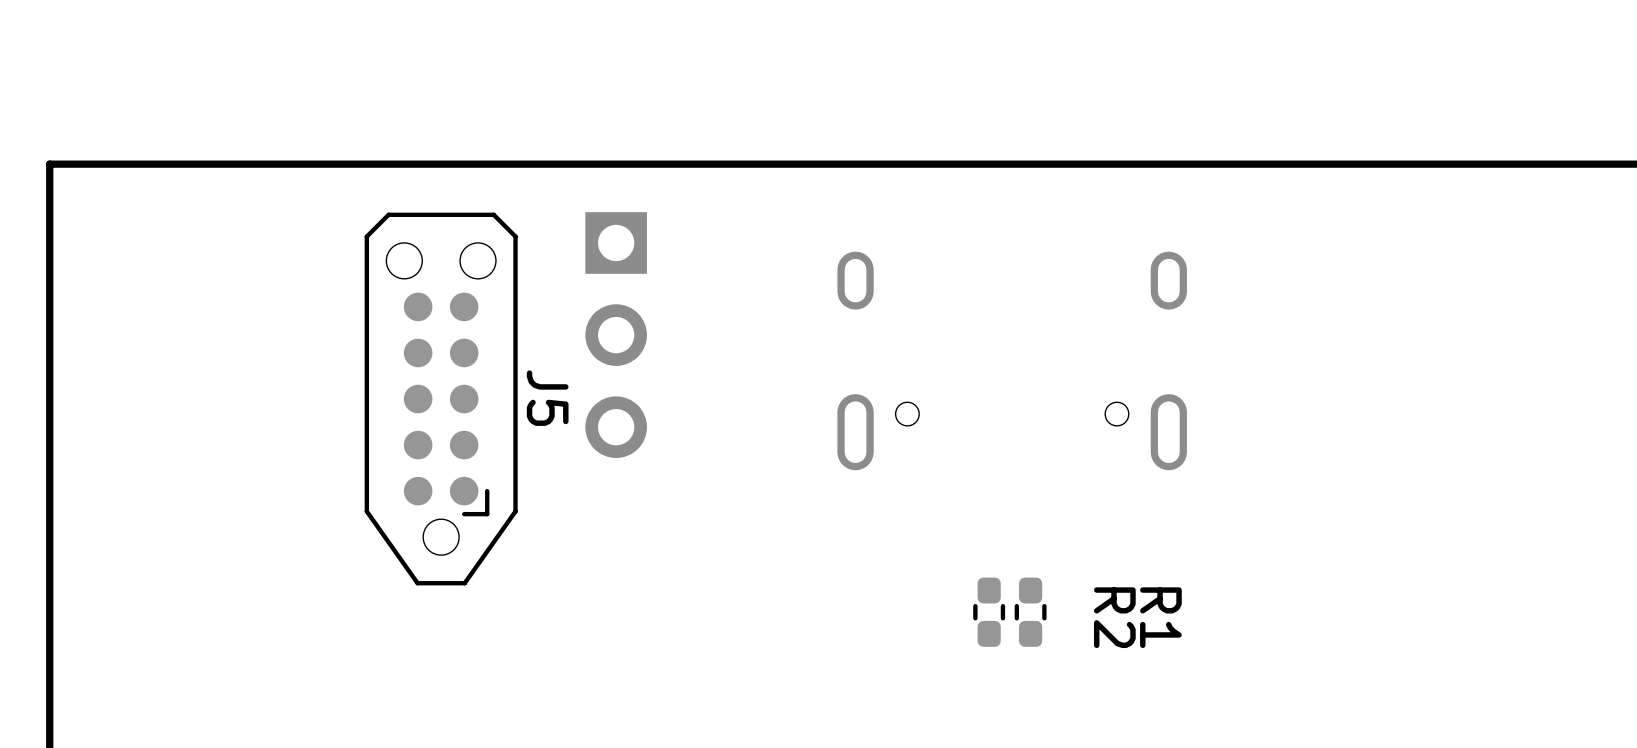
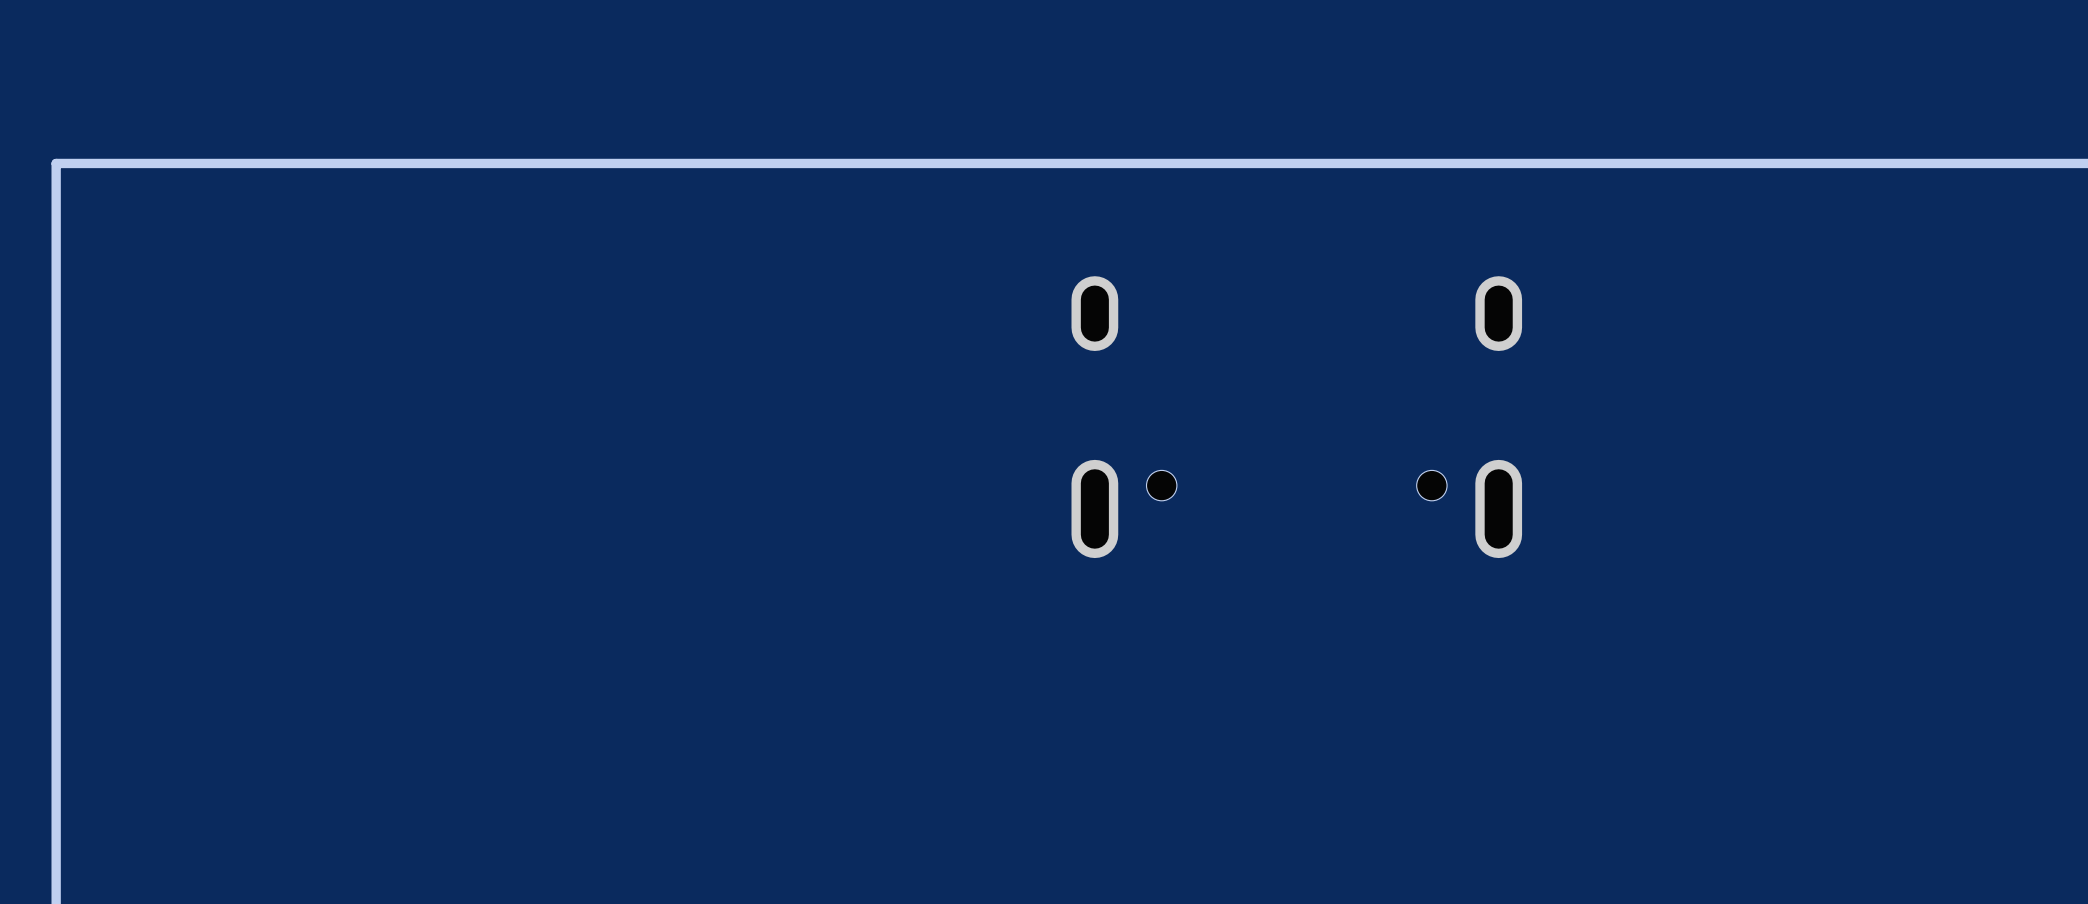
part: (616, 335) -> none
J5: (441, 399) -> none
R2: (989, 612) -> none
R1: (1030, 612) -> none

